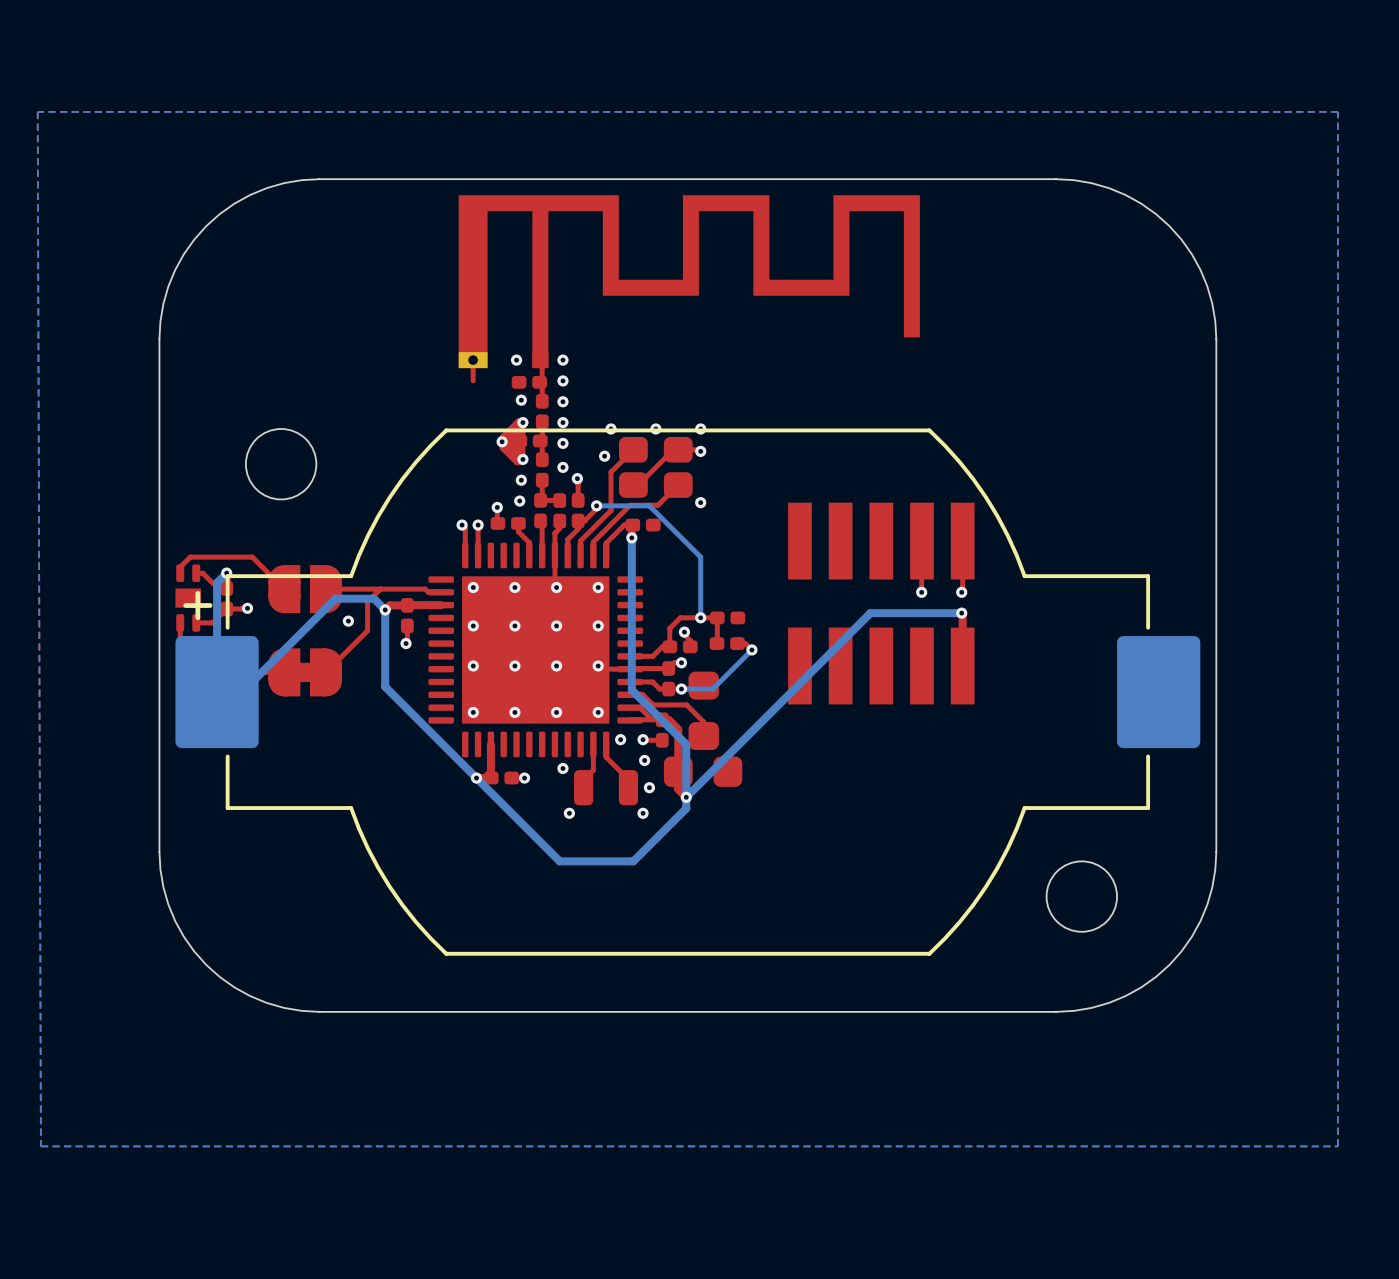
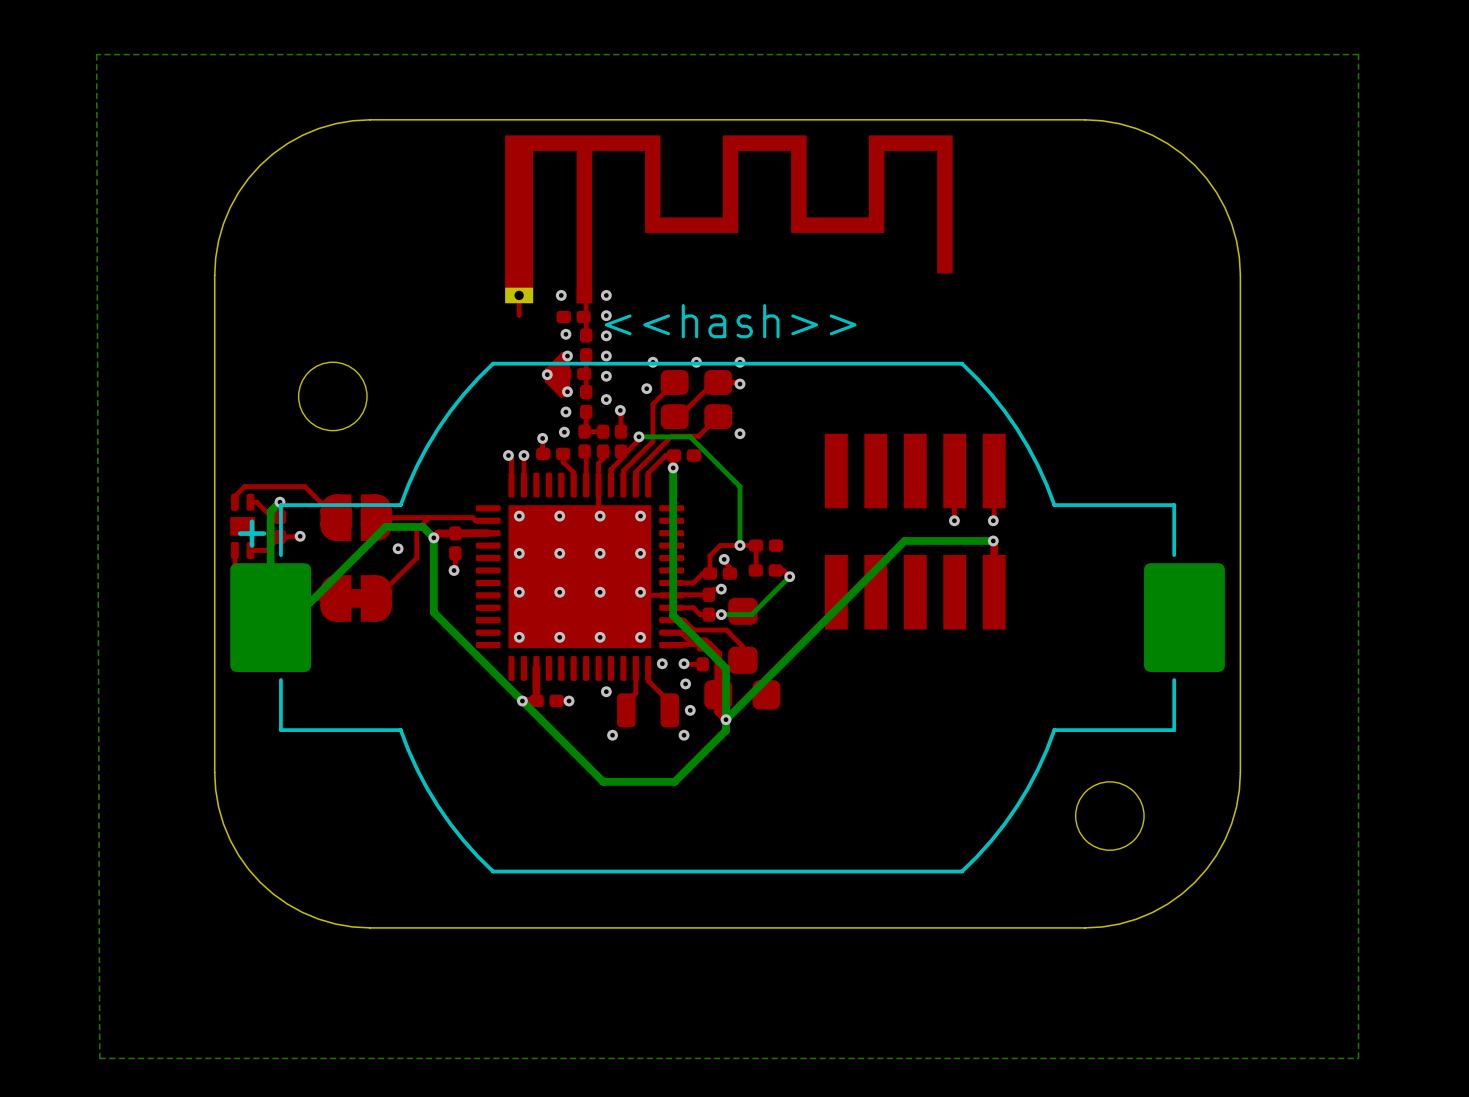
text: none -> <<hash>> (730, 321)

